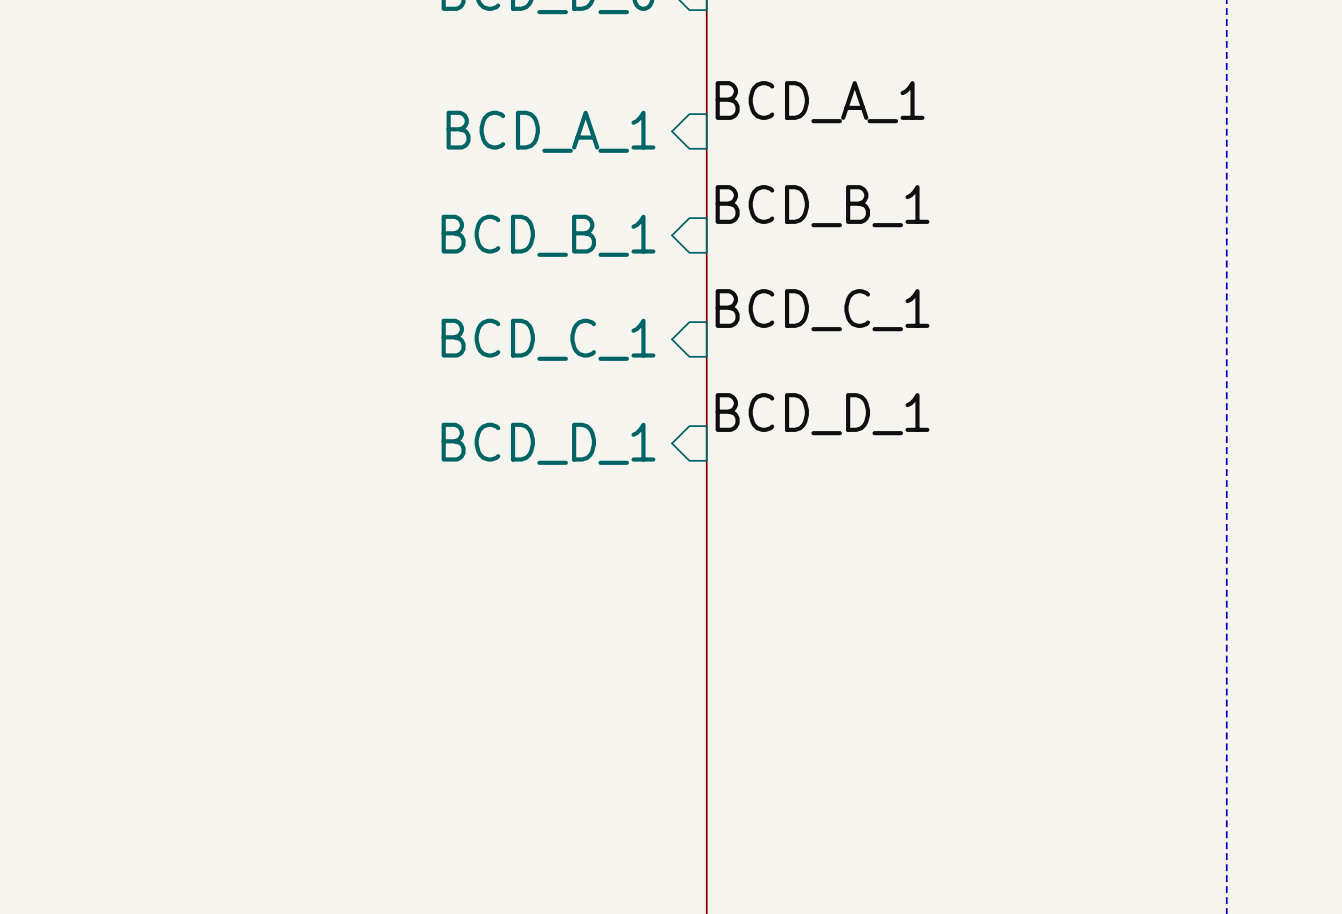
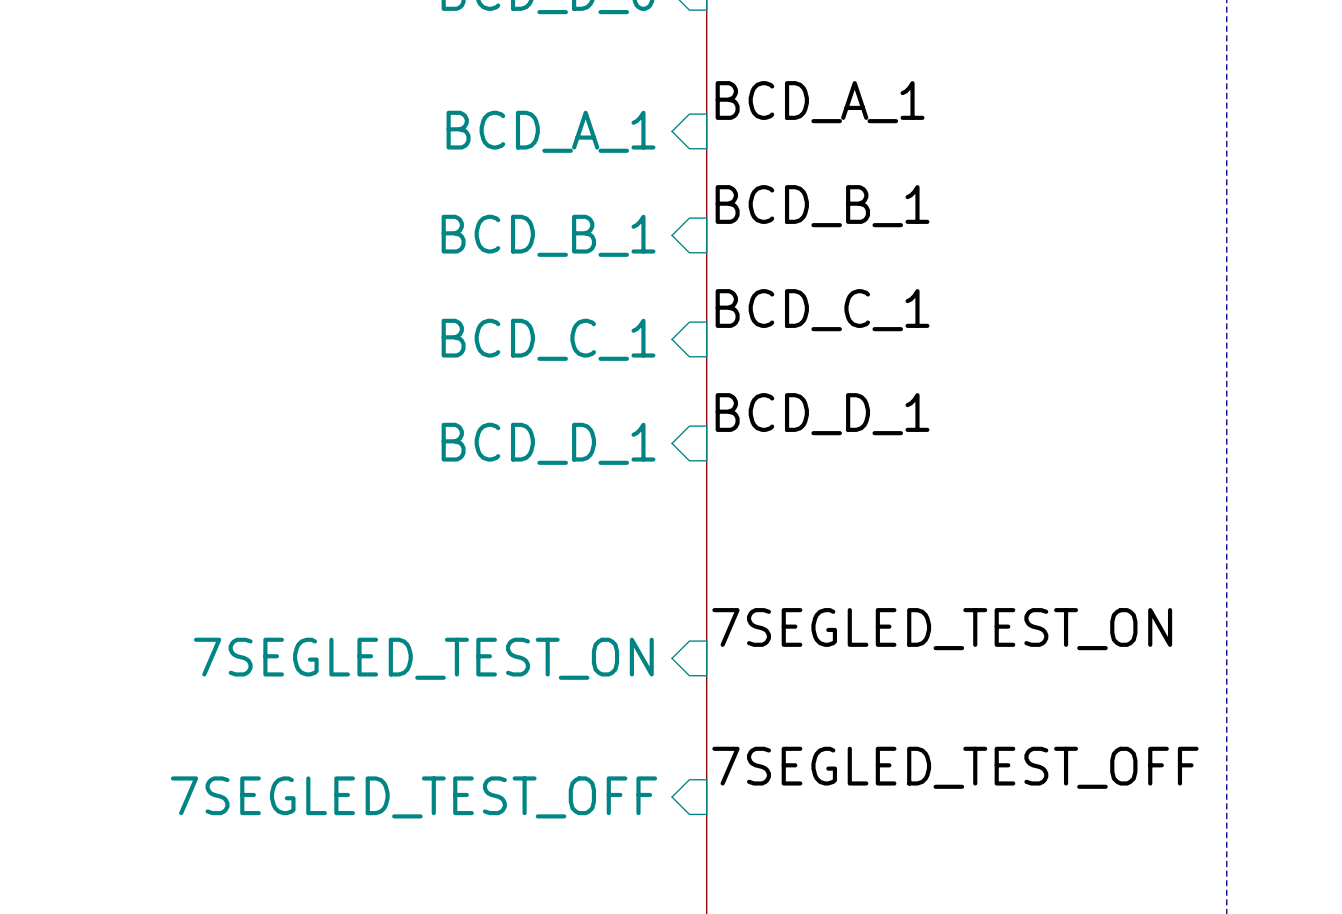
label: none -> 7SEGLED_TEST_ON (942, 629)
sheet pin: none -> 7SEGLED_TEST_ON (423, 658)
label: none -> 7SEGLED_TEST_OFF (955, 767)
sheet pin: none -> 7SEGLED_TEST_OFF (413, 797)

